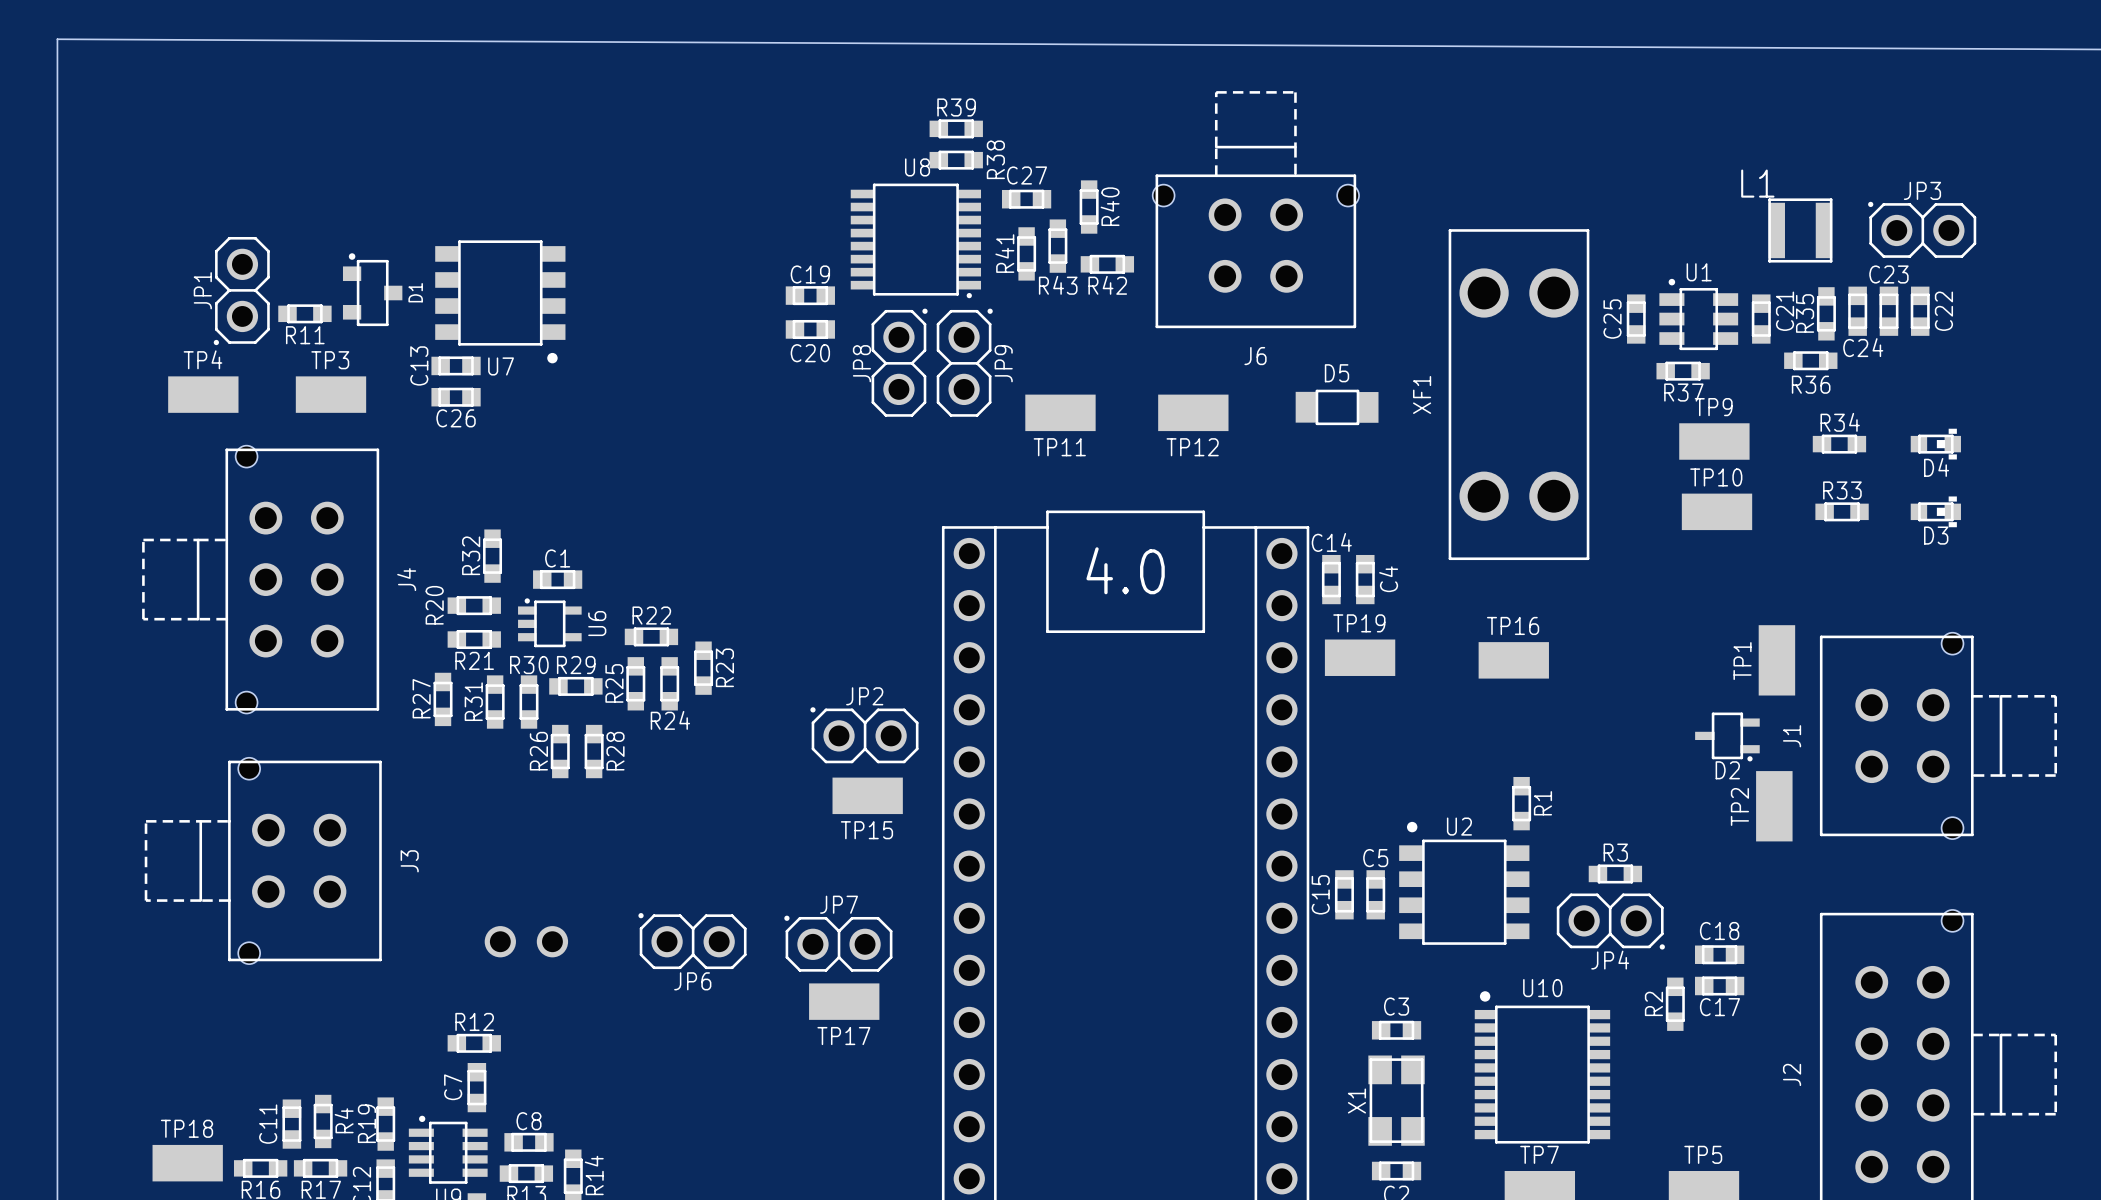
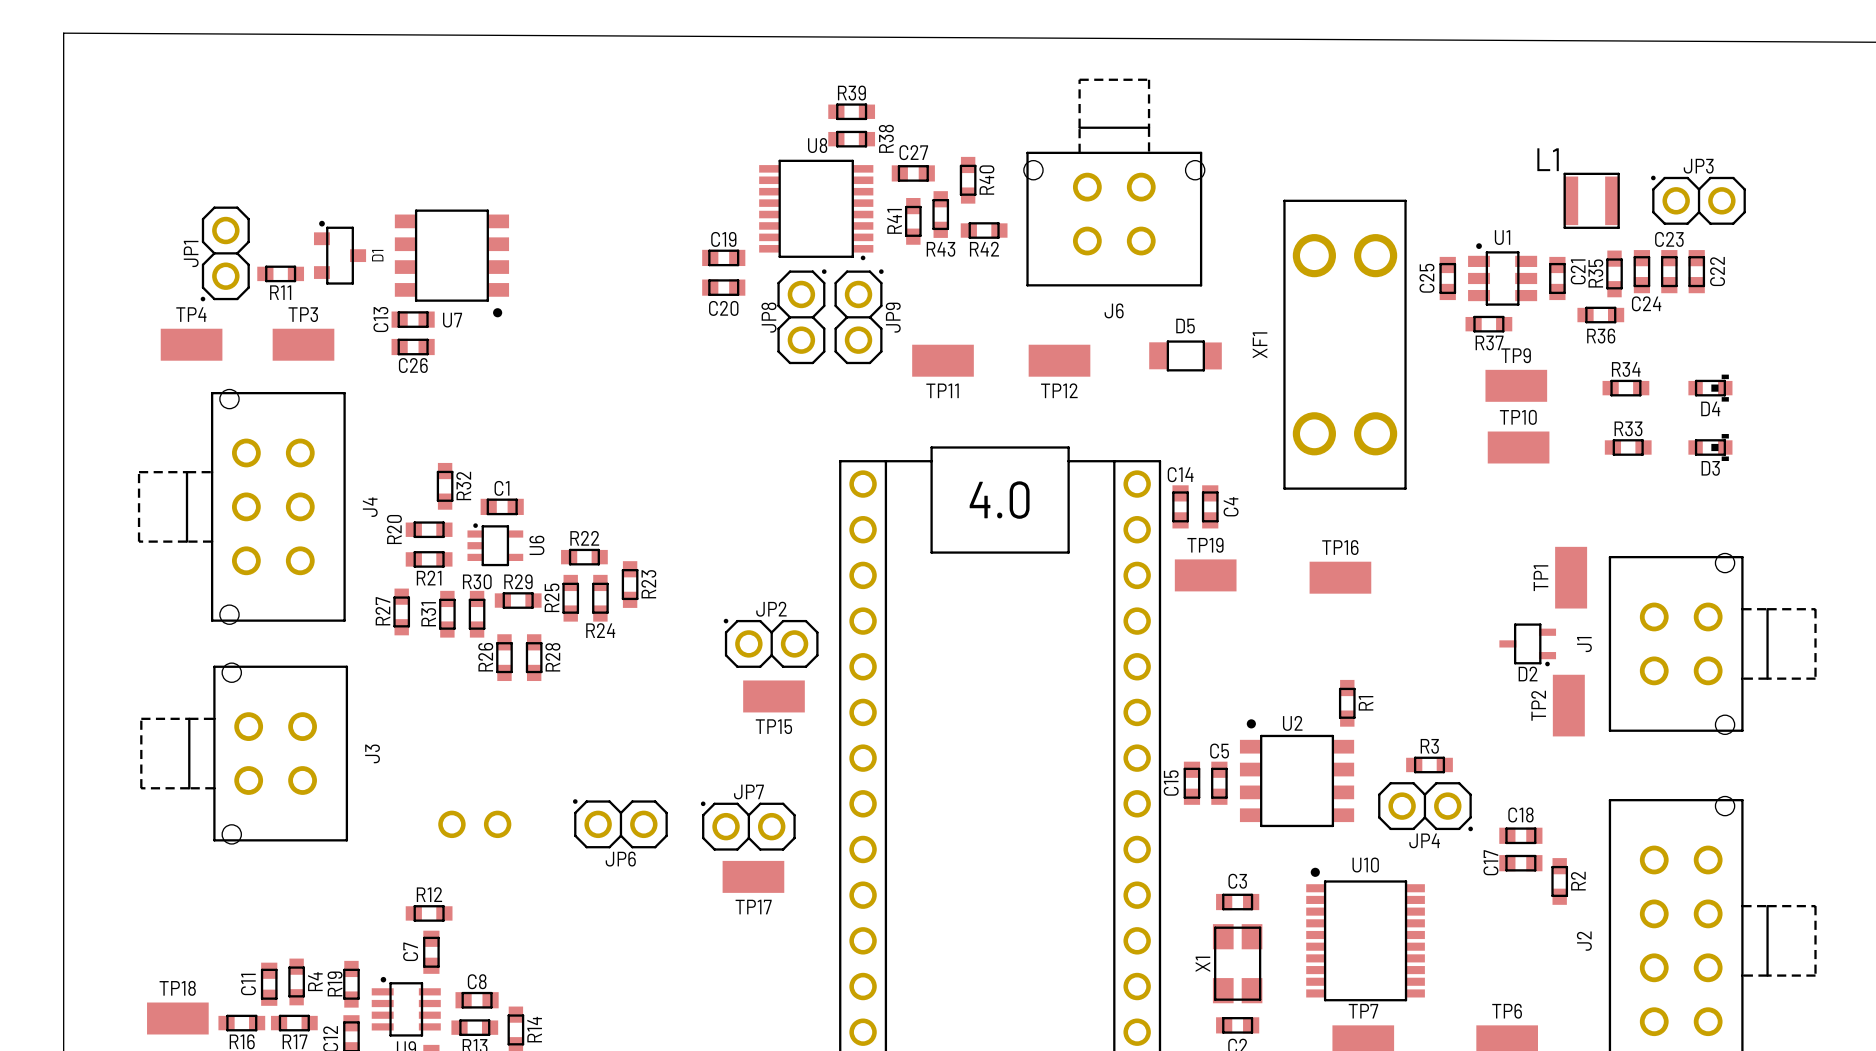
R32 name position: R32 (471, 555) -> R32 (463, 485)
R2 name position: R2 (1653, 1003) -> R2 (1578, 881)
R2 position: (1675, 1004) -> (1559, 881)
C17 name rotation: 0° (1719, 1007) -> 90° counterclockwise (1490, 862)
TP5 name: TP5 (1703, 1154) -> TP6 (1507, 1011)

